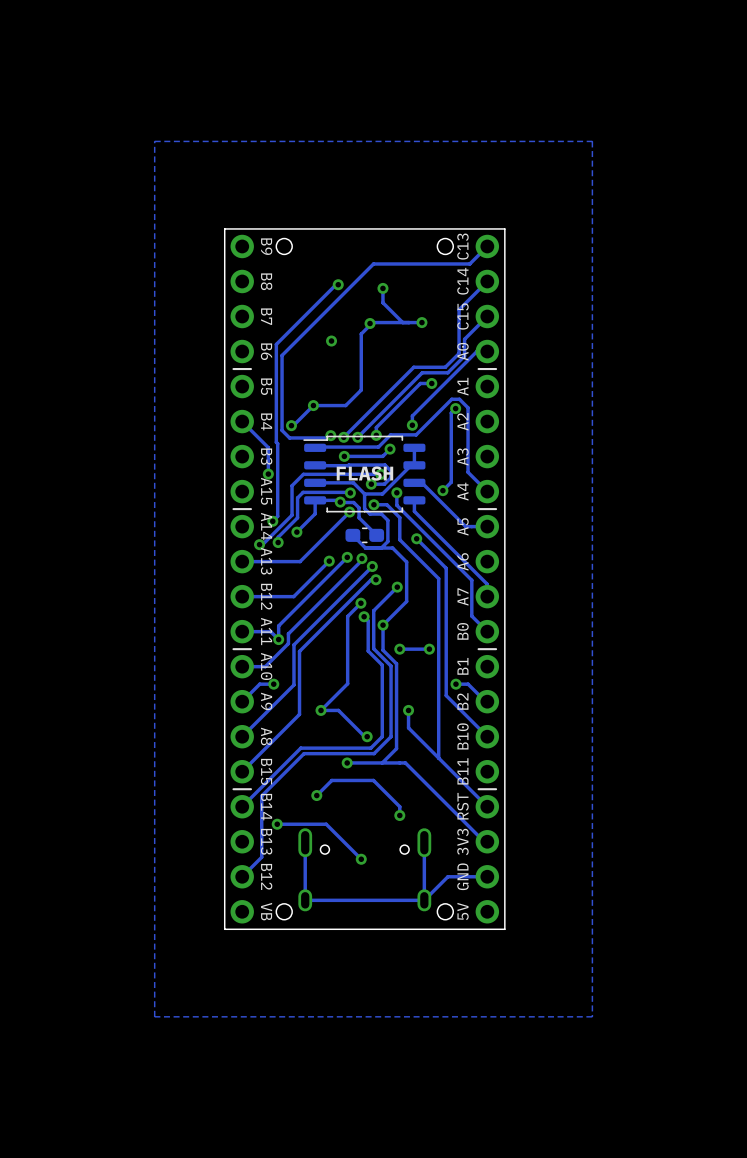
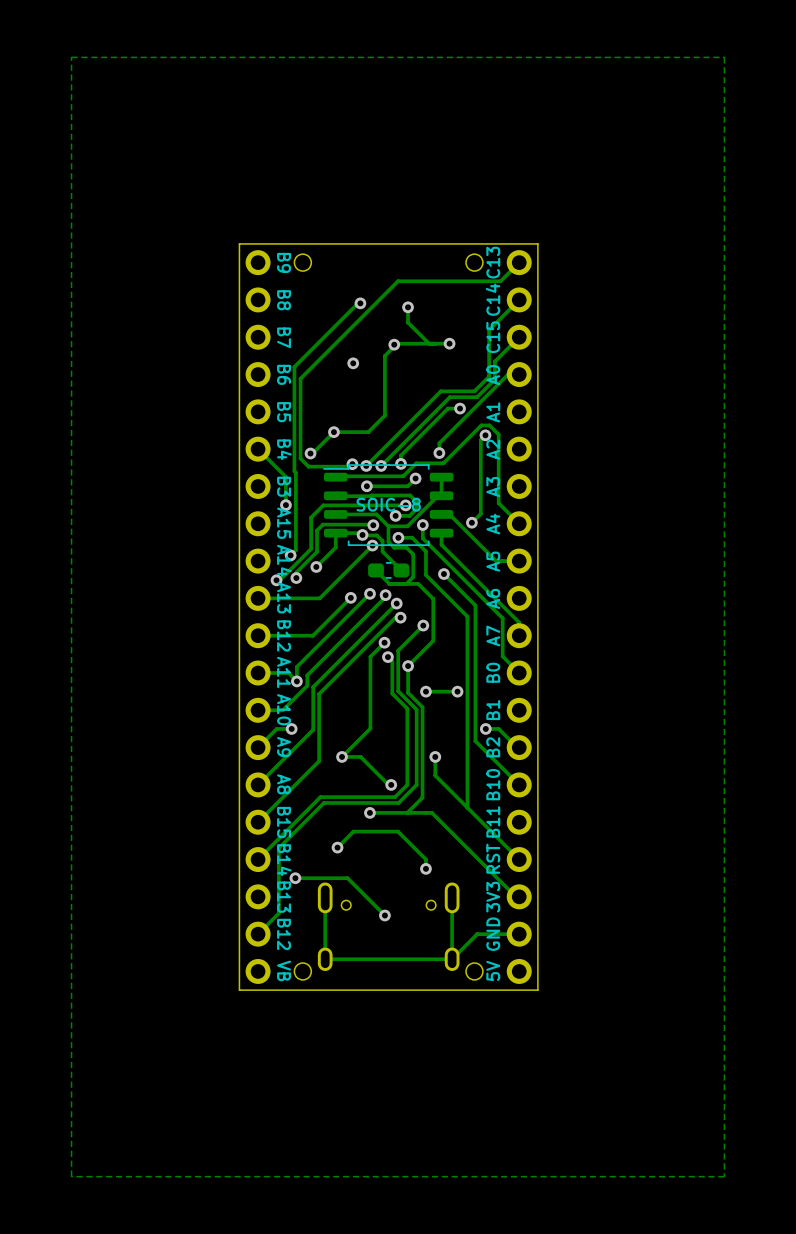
zone outline: (592, 141) (592, 1016) (154, 1016) (154, 141) (592, 141) -> (724, 57) (724, 1176) (71, 1176) (71, 57) (724, 57)
line: (250, 369) (233, 369) -> none
line: (496, 369) (478, 369) -> none
text: FLASH (364, 473) -> SOIC-8 (388, 504)
line: (250, 509) (233, 509) -> none
line: (496, 509) (478, 509) -> none
line: (250, 649) (233, 649) -> none
line: (496, 649) (478, 649) -> none
line: (250, 789) (233, 789) -> none
line: (496, 789) (478, 789) -> none

